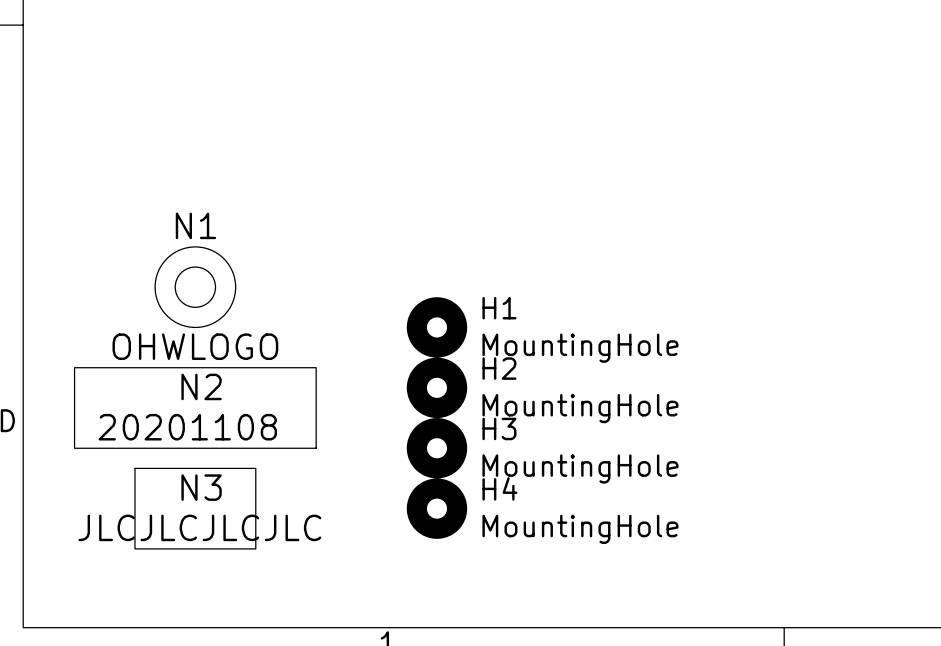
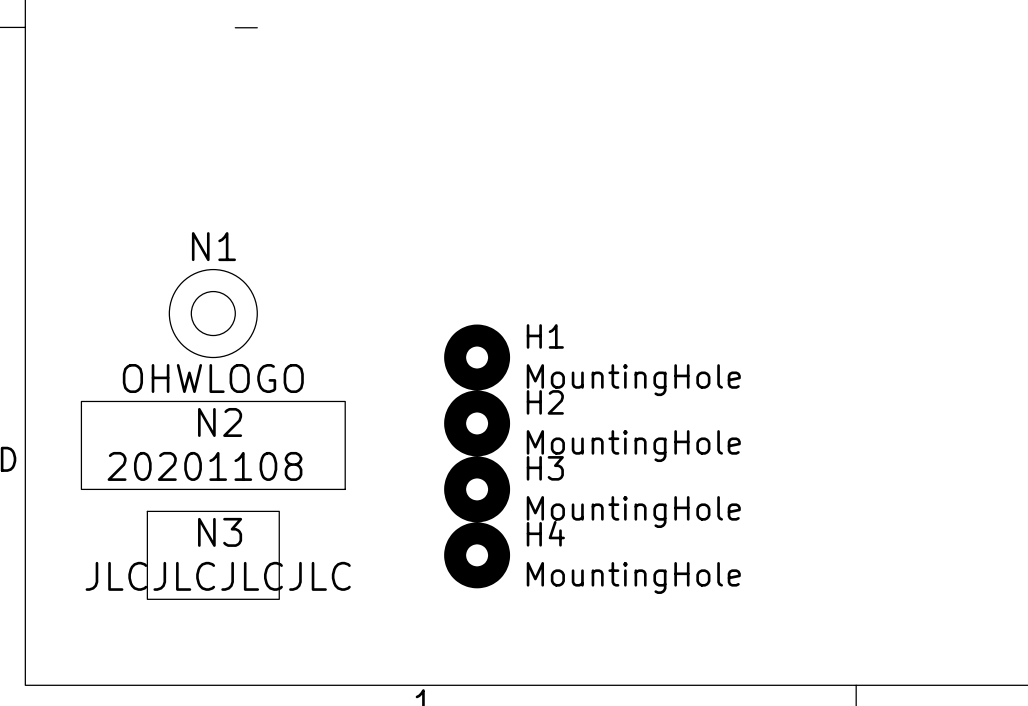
wire: none -> (235, 27) (257, 27)

